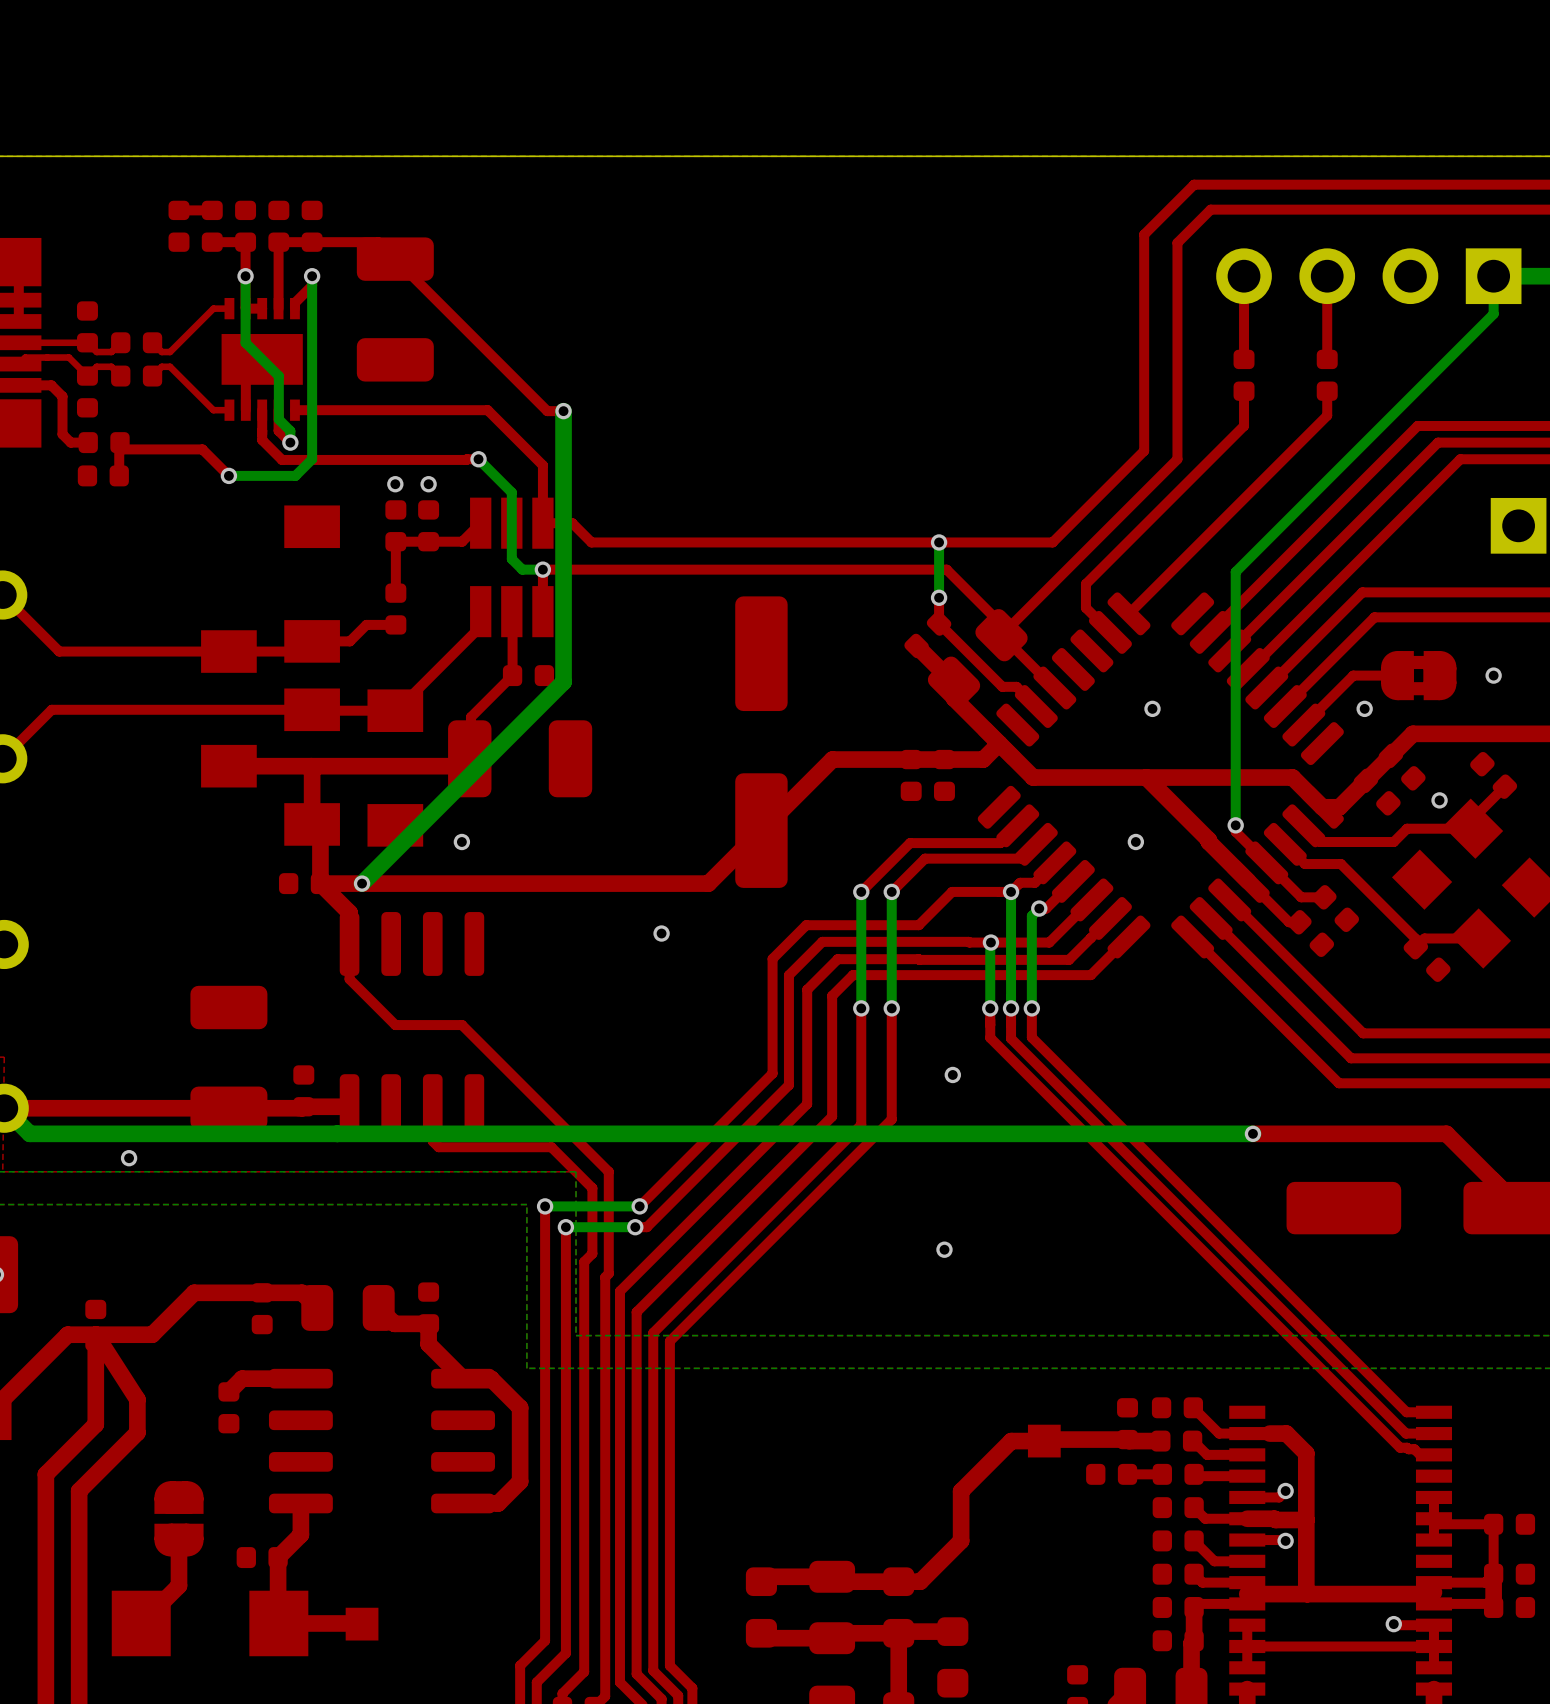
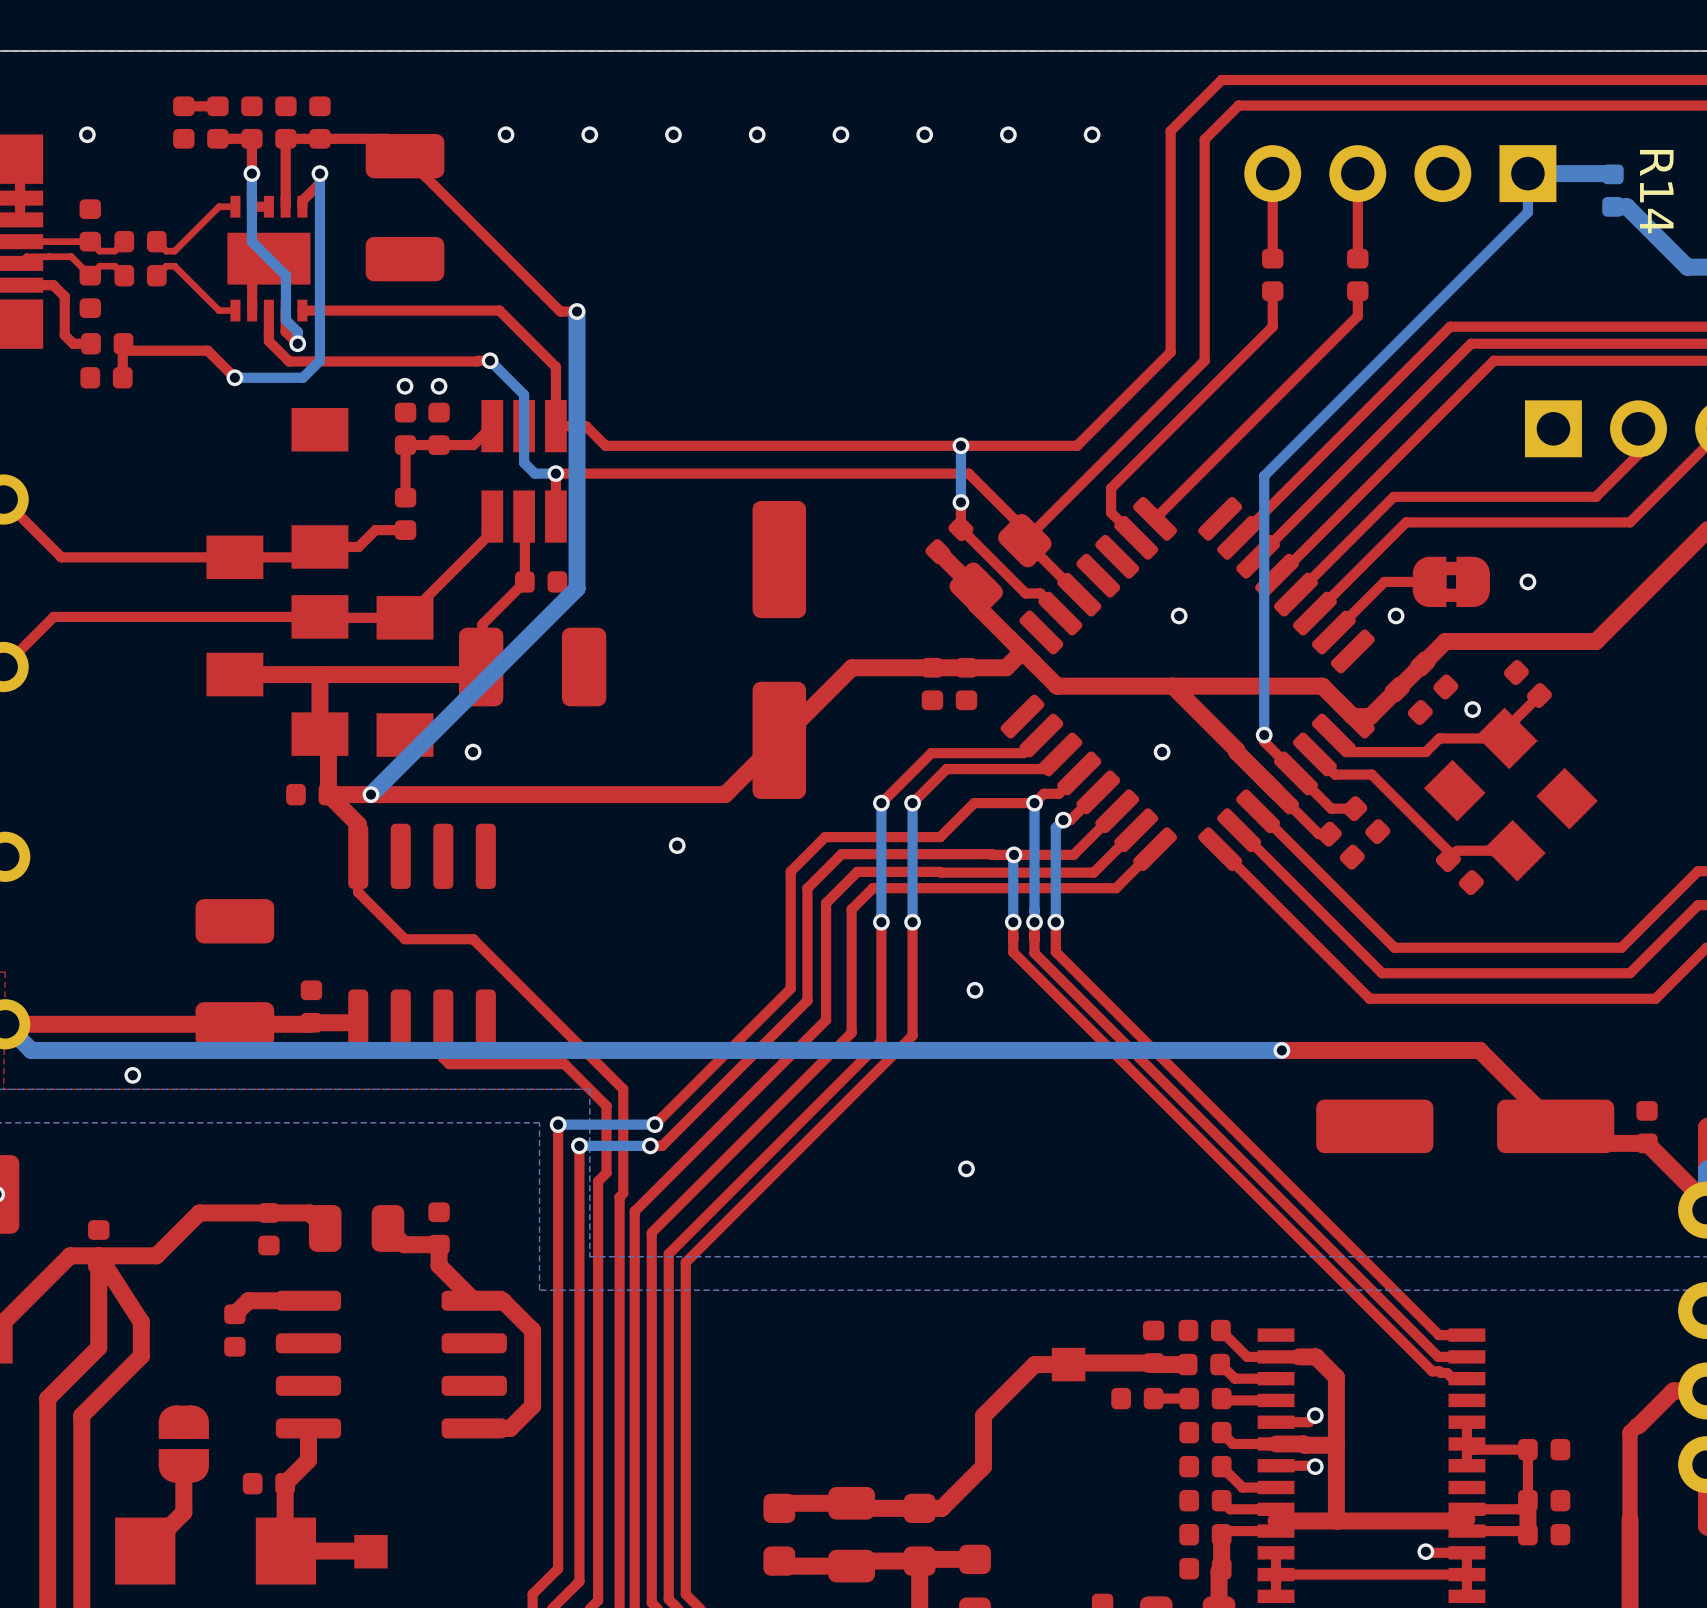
via: none -> (87, 134)
via: none -> (506, 134)
via: none -> (589, 134)
via: none -> (673, 134)
via: none -> (757, 134)
via: none -> (840, 134)
via: none -> (924, 134)
via: none -> (1008, 134)
via: none -> (1092, 134)

